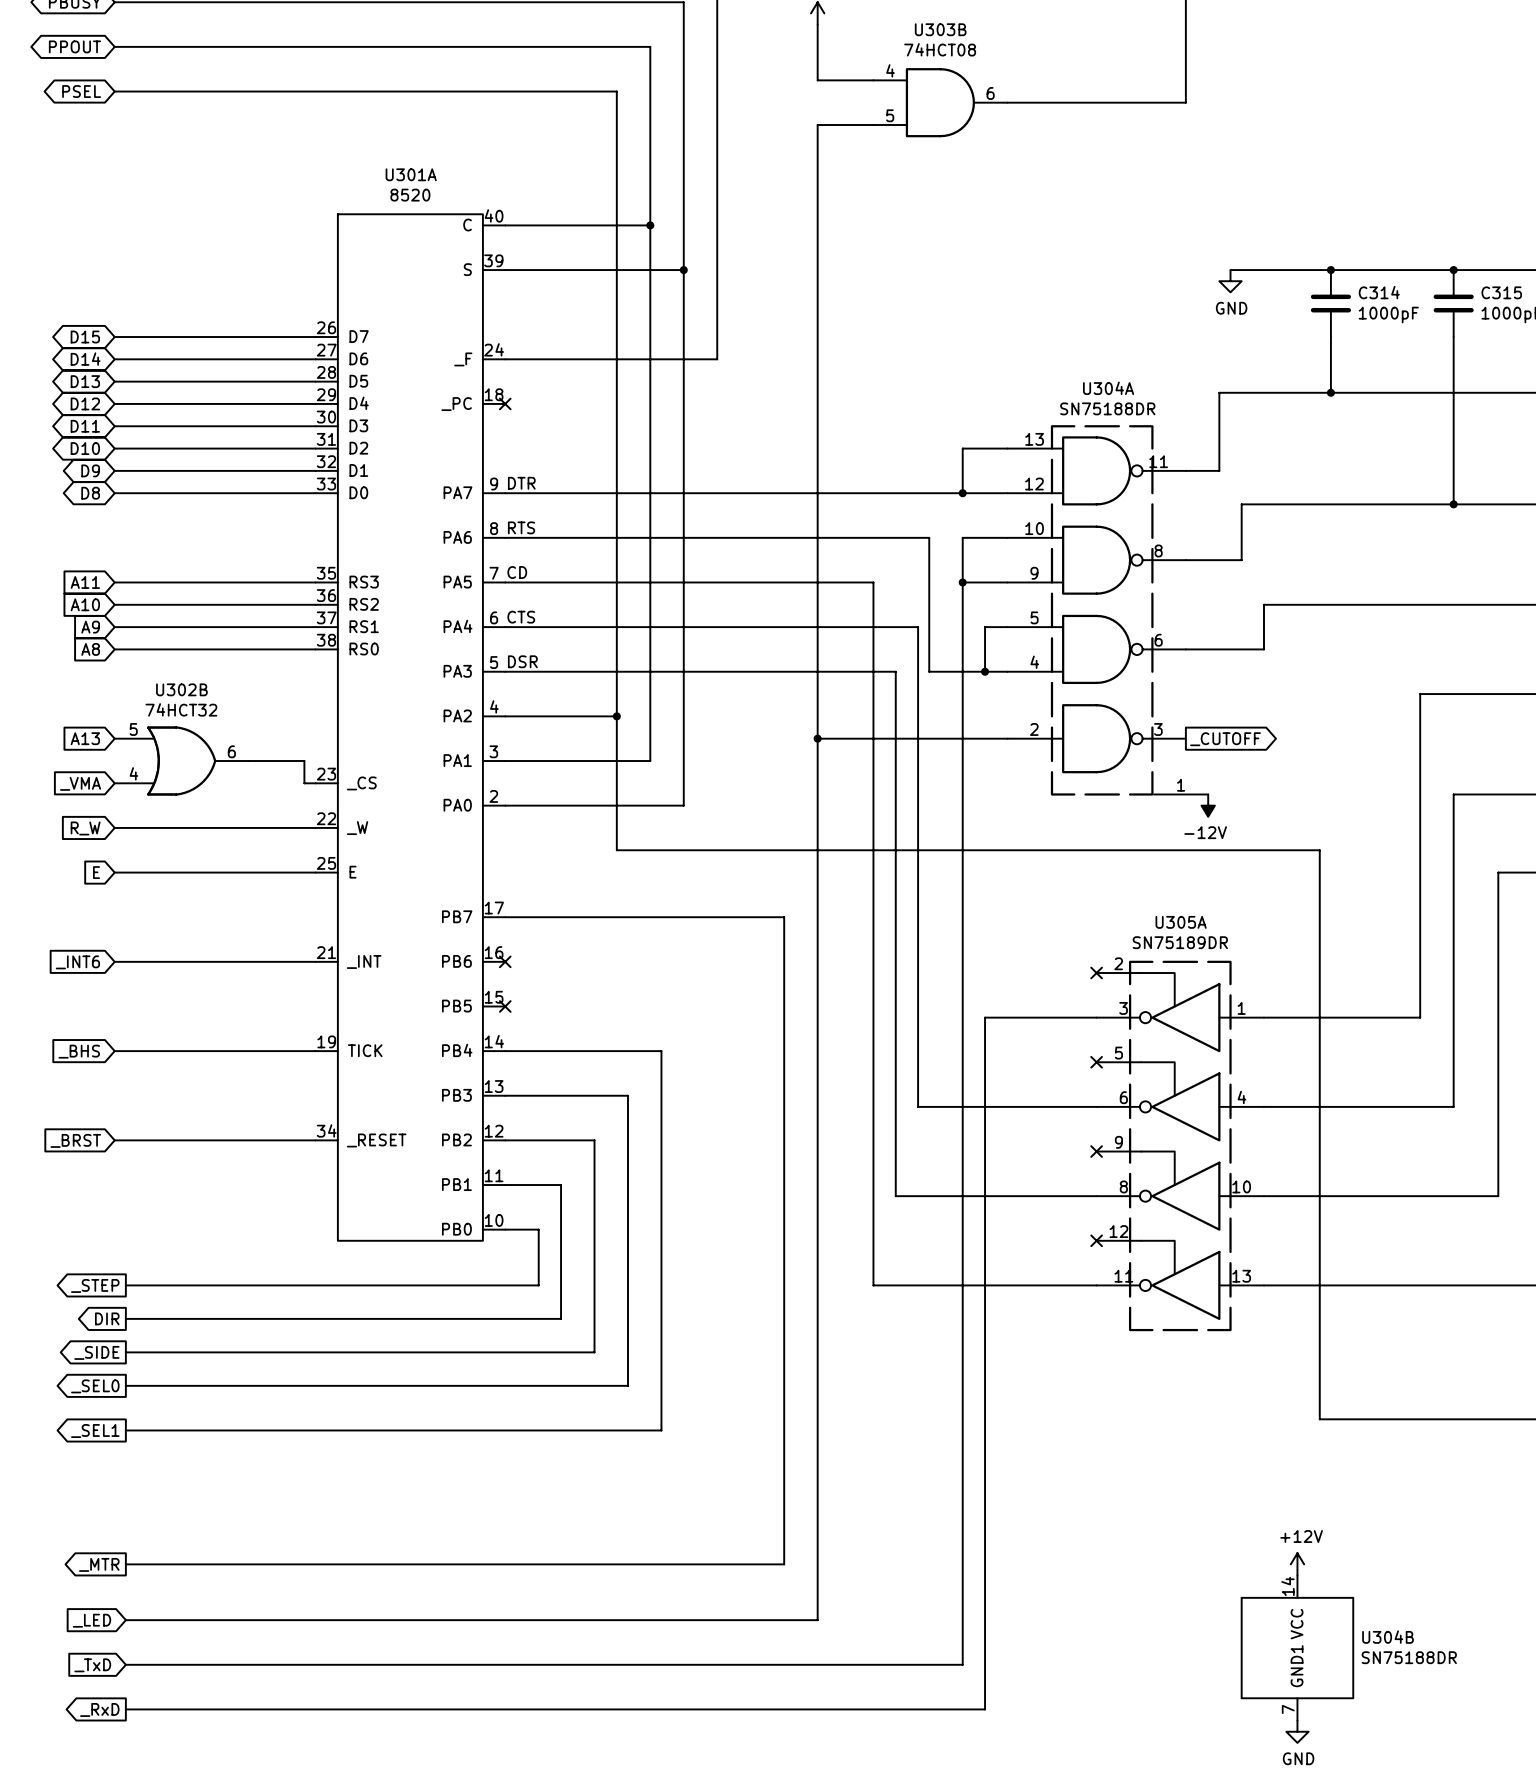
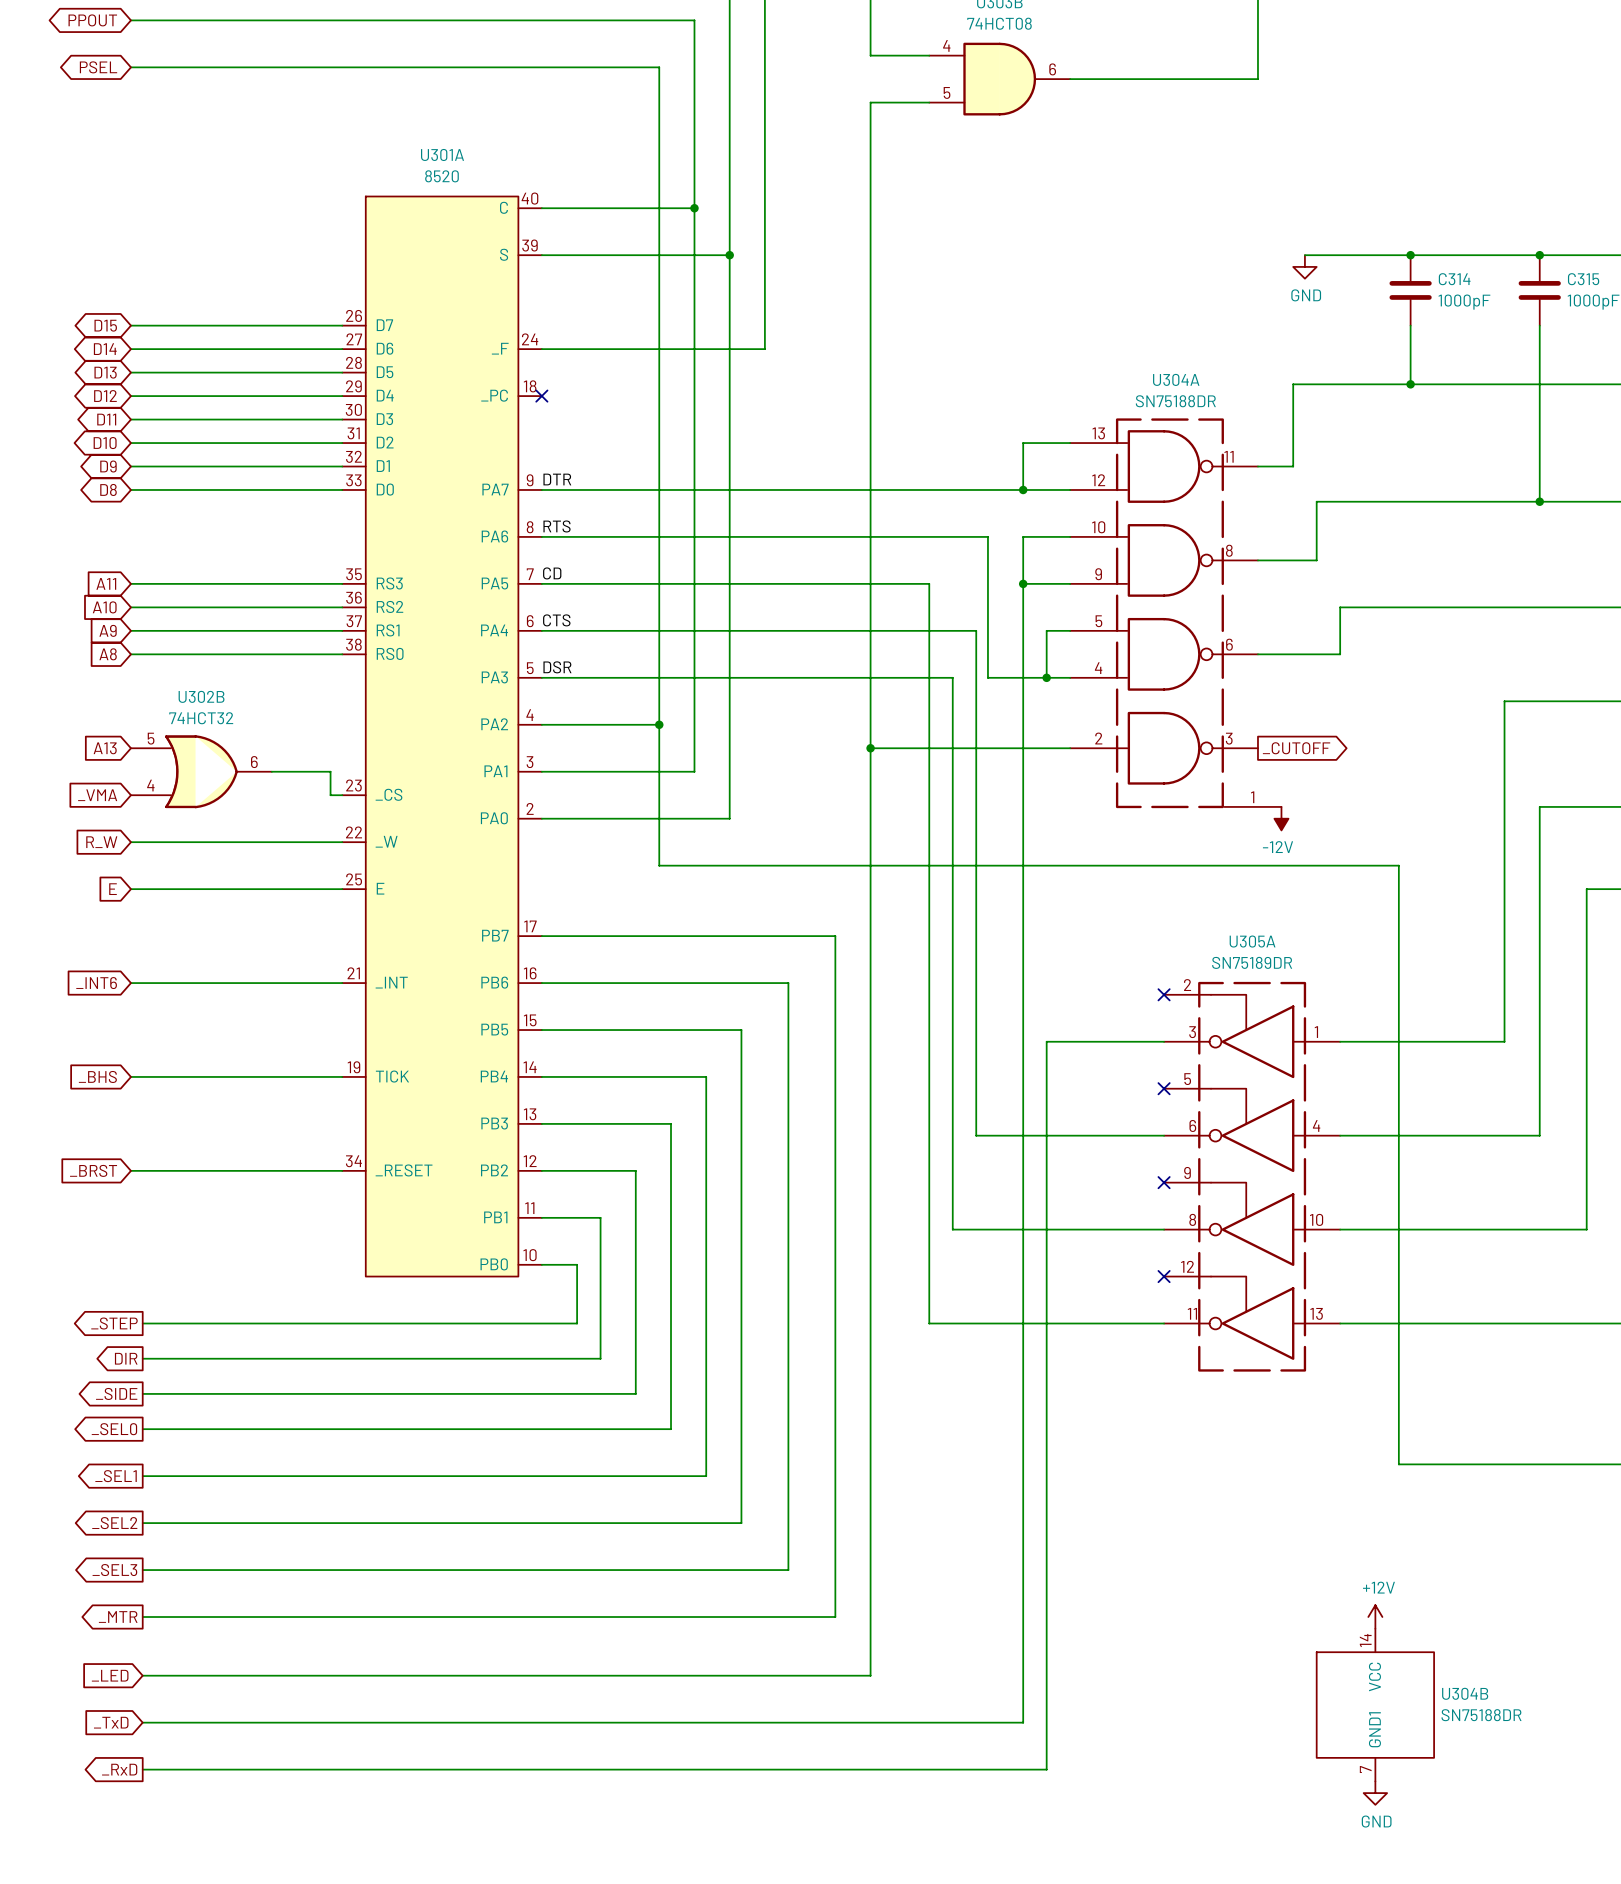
wire: none -> (541, 983) (788, 983) (788, 1570) (142, 1570)
no-connect mark: (505, 961) -> none
wire: none -> (541, 1030) (741, 1030) (741, 1523) (142, 1523)
no-connect mark: (505, 1006) -> none
global label: none -> _SEL2 (114, 1523)
global label: none -> _SEL3 (114, 1570)

